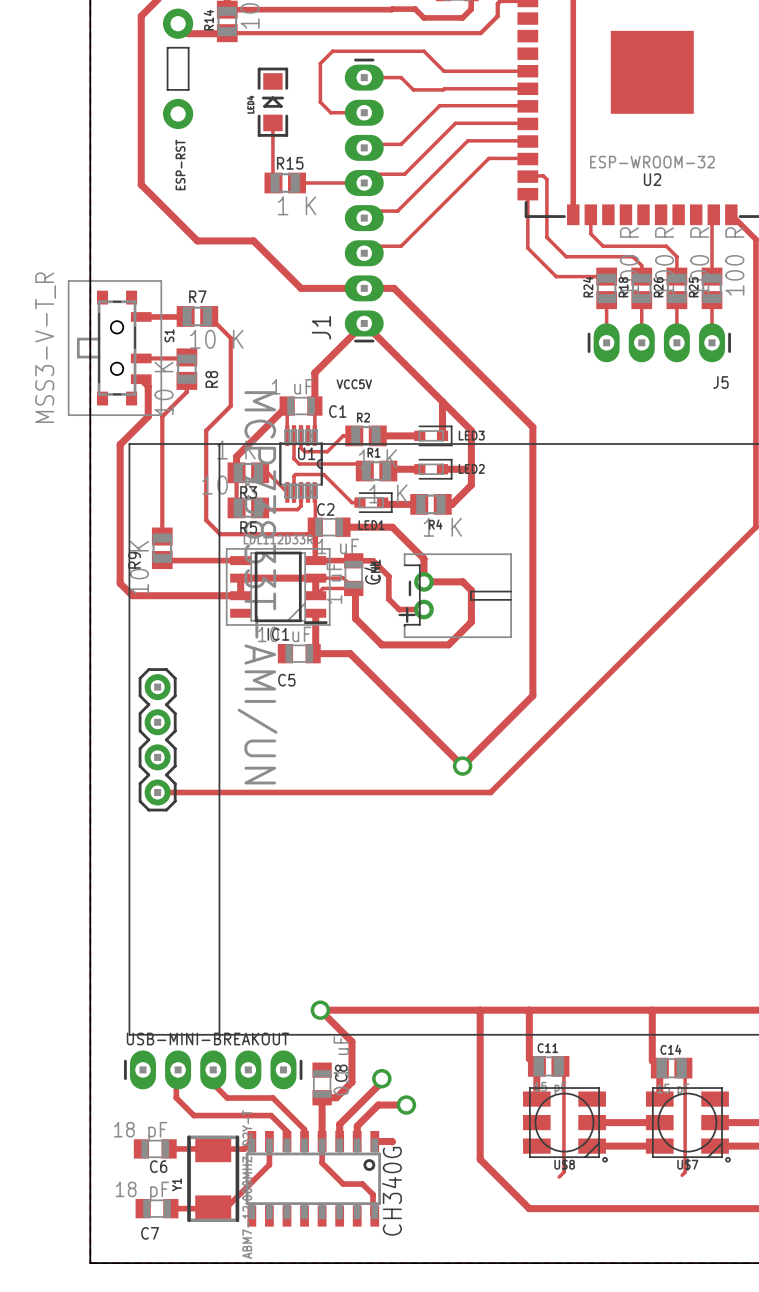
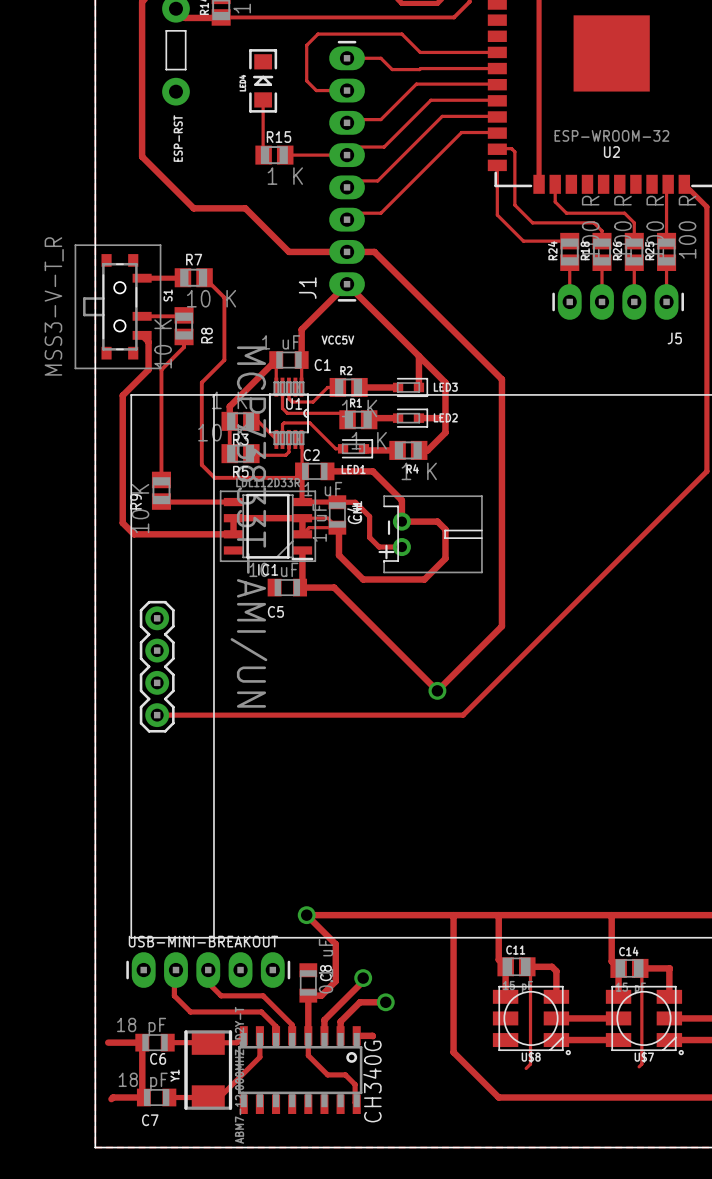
track: none -> (527, 966) (551, 966) (556, 971) (556, 996)
track: none -> (641, 969) (669, 968) (669, 996)
track: none -> (108, 1042) (142, 1042) (142, 1095) (143, 1097) (113, 1097) (111, 1099)

